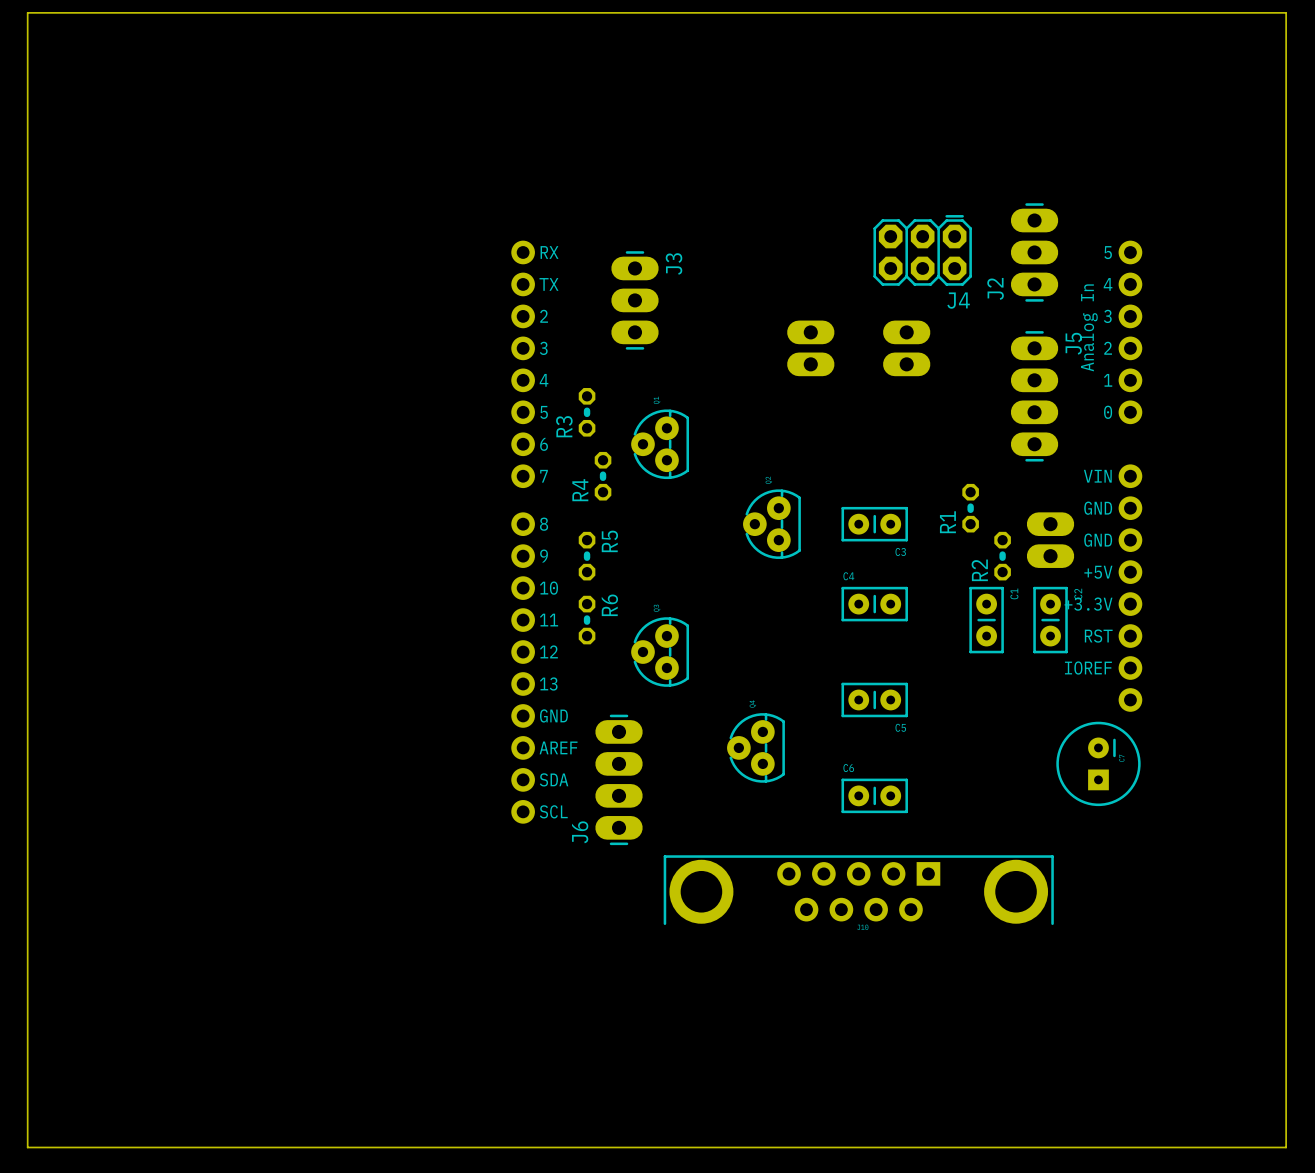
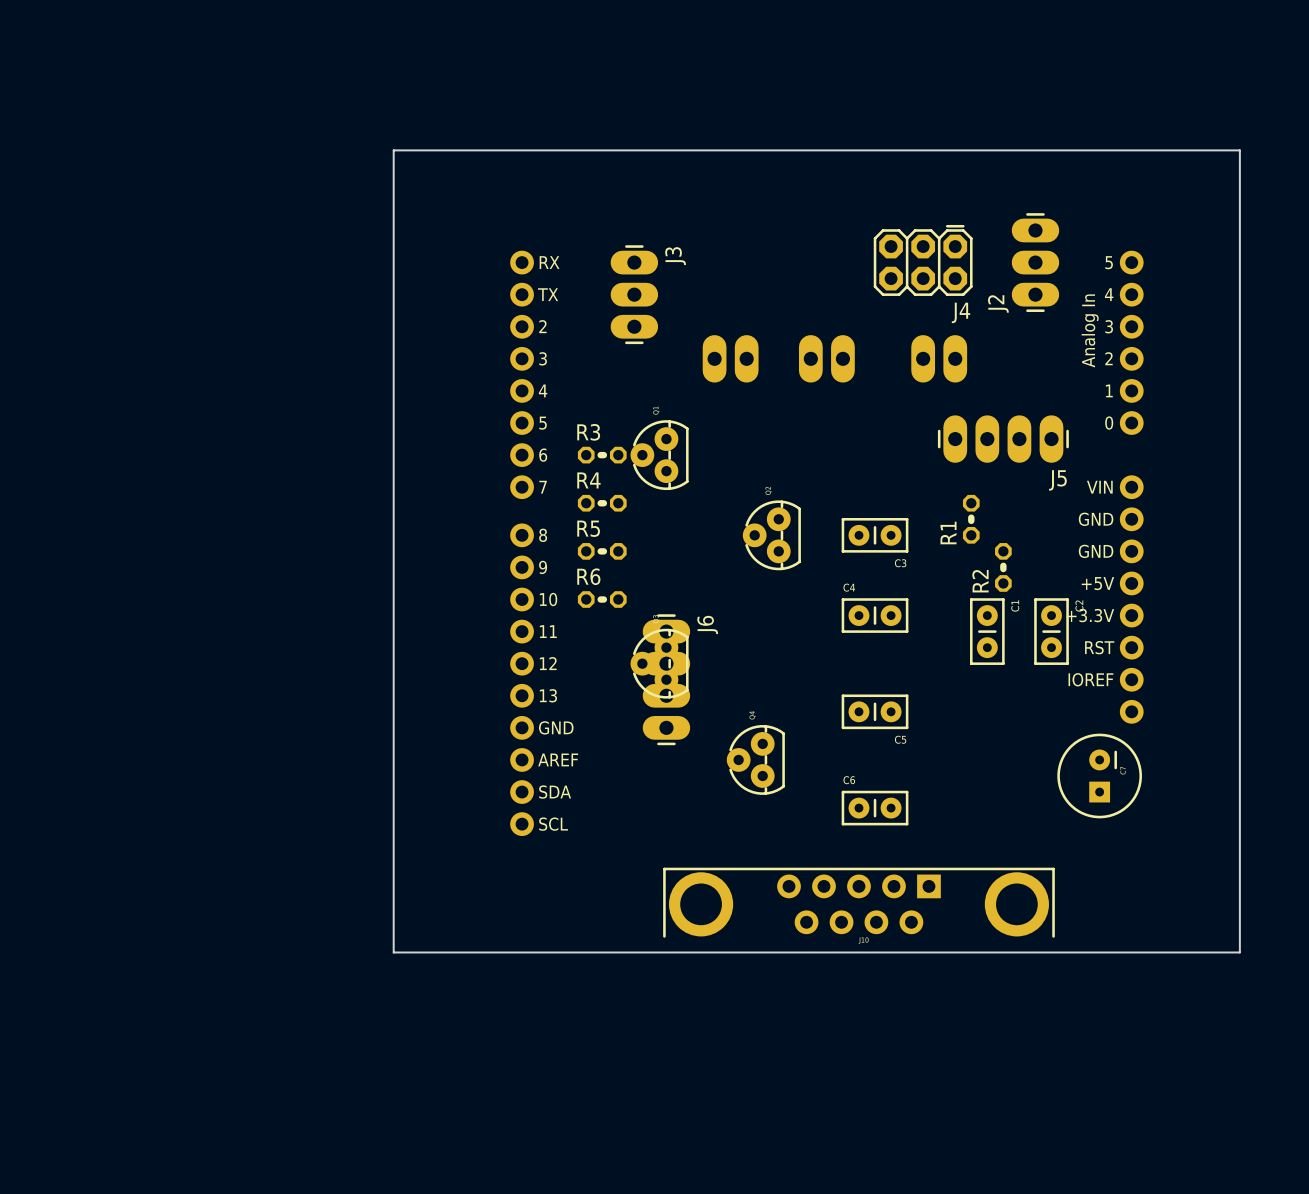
board edge: (27, 12) (1286, 12) (1286, 1147) (27, 1147) (27, 12) -> none
board edge: none -> (393, 150) (1239, 150) (1239, 952) (393, 952) (393, 150)
J3 position: (635, 300) -> (634, 294)
part: none -> (730, 358)
part rotation: 0° (810, 348) -> 90° clockwise (826, 358)
part rotation: 0° (906, 348) -> 90° clockwise (939, 358)
J5 rotation: 0° (1034, 396) -> 90° clockwise (1003, 439)
R3 rotation: 0° (587, 412) -> 90° clockwise (602, 455)
R3 position: (587, 412) -> (602, 455)
R4 rotation: 0° (603, 476) -> 90° clockwise (602, 503)
part: (1050, 540) -> none
R5 name position: R5 (609, 541) -> R5 (588, 528)
R5 rotation: 0° (587, 556) -> 90° clockwise (602, 551)
R6 name position: R6 (609, 605) -> R6 (588, 576)
R6 rotation: 0° (587, 620) -> 90° clockwise (602, 599)
R6 position: (587, 620) -> (602, 599)
J6 position: (619, 779) -> (666, 679)
J6 name position: J6 (580, 832) -> J6 (707, 624)

